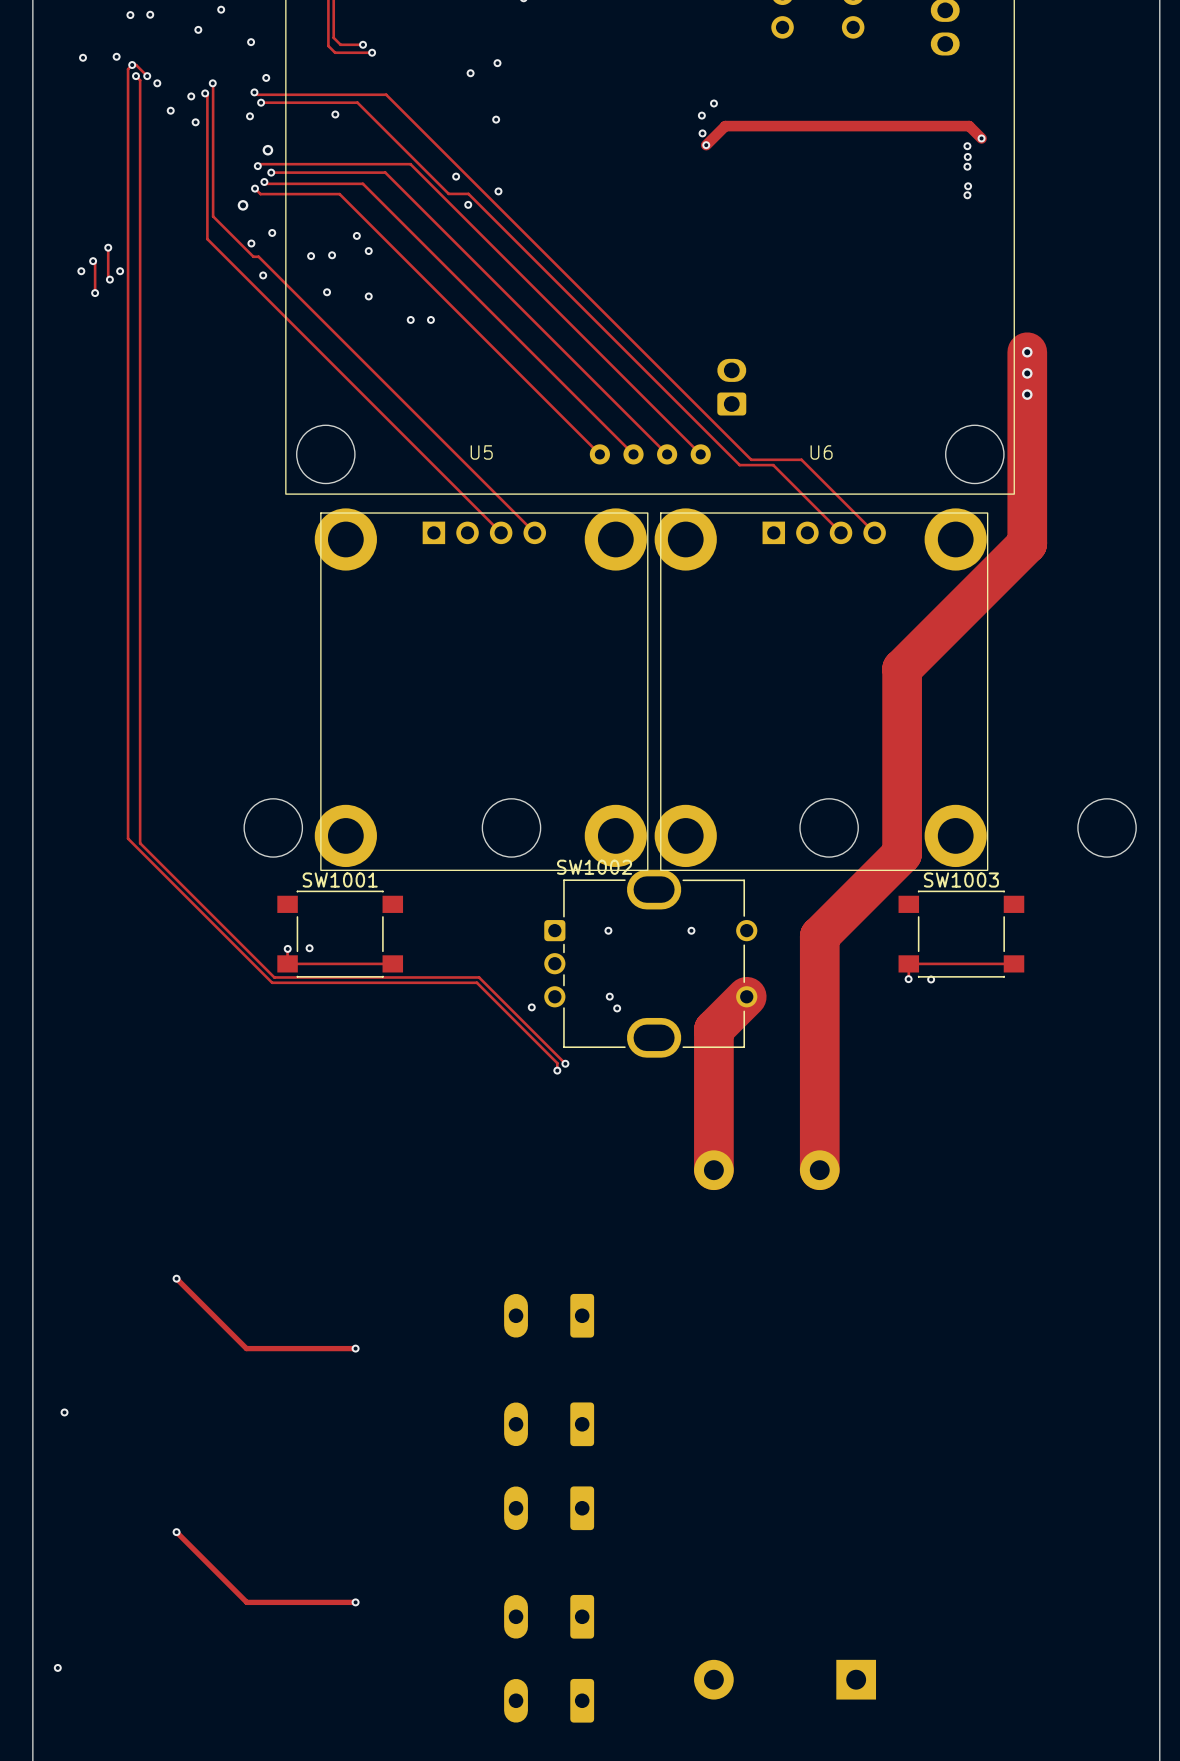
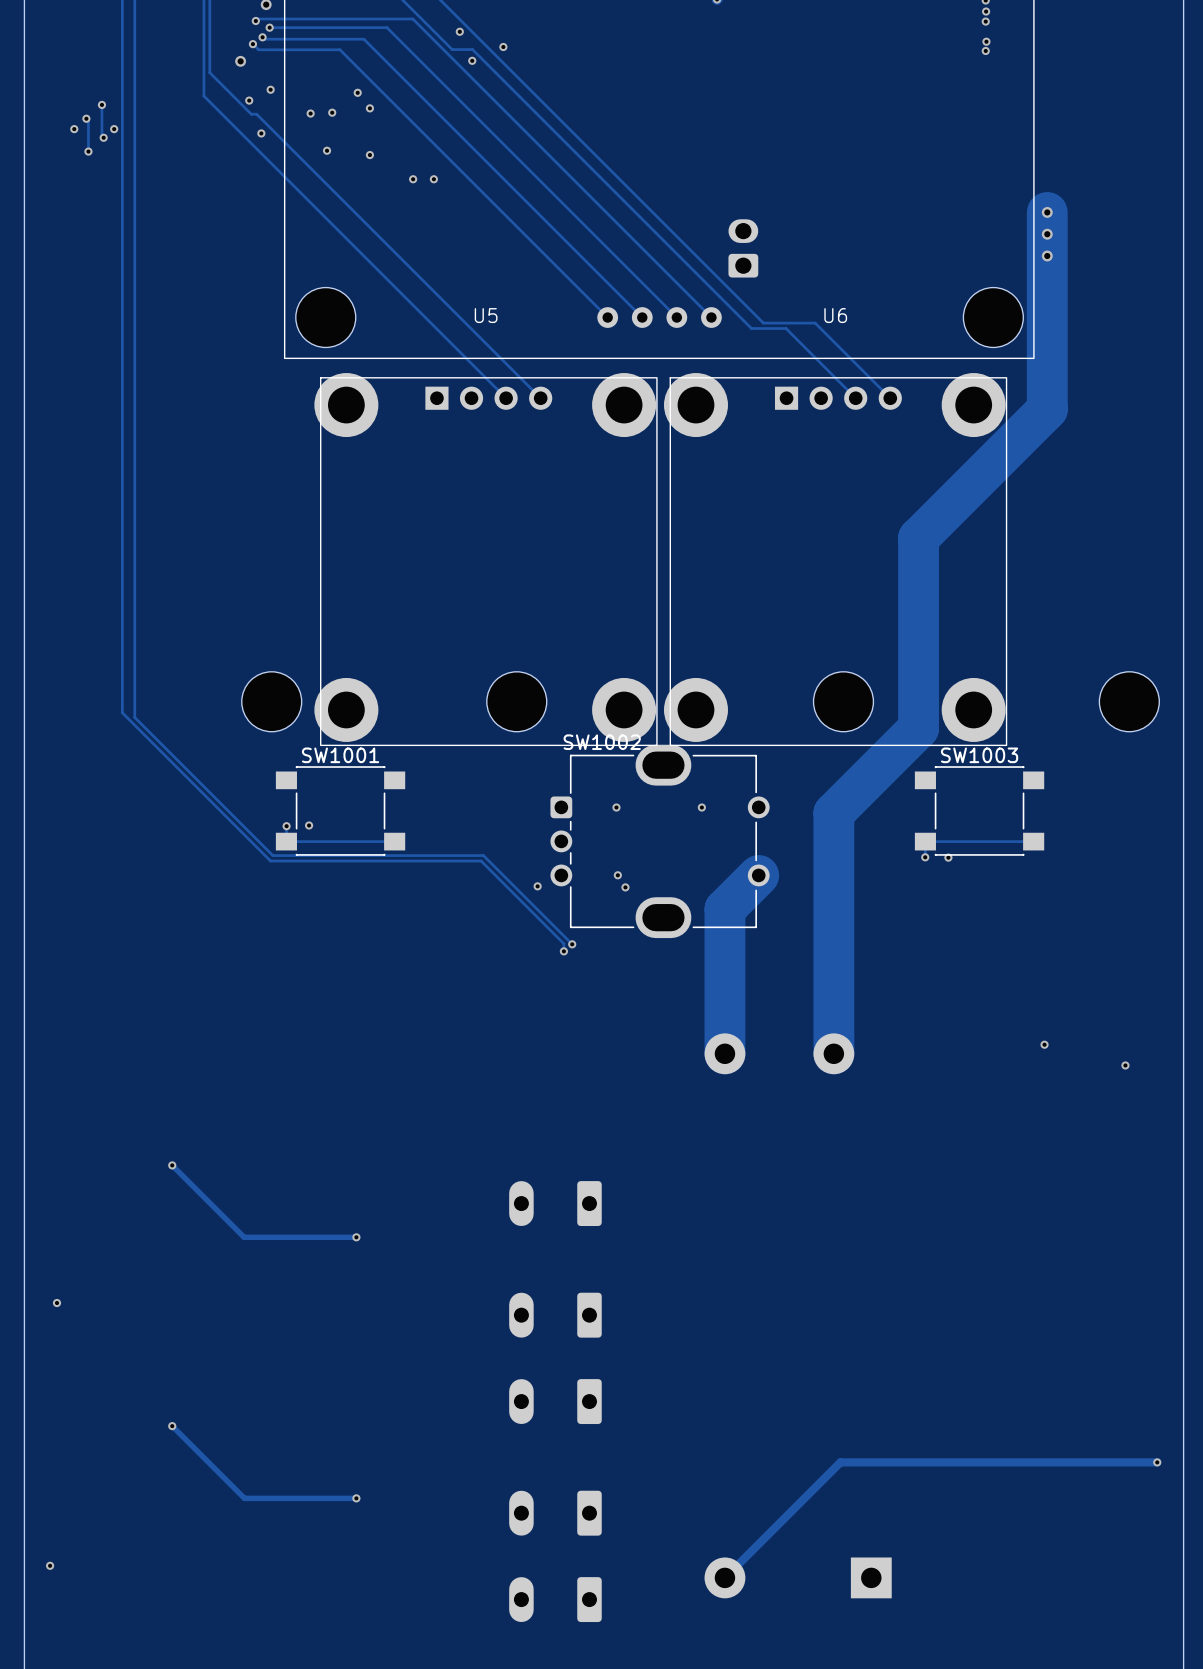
via: none -> (1044, 1044)
via: none -> (1125, 1065)
track: none -> (1157, 1462) (840, 1462) (724, 1577)
via: none -> (1157, 1462)

